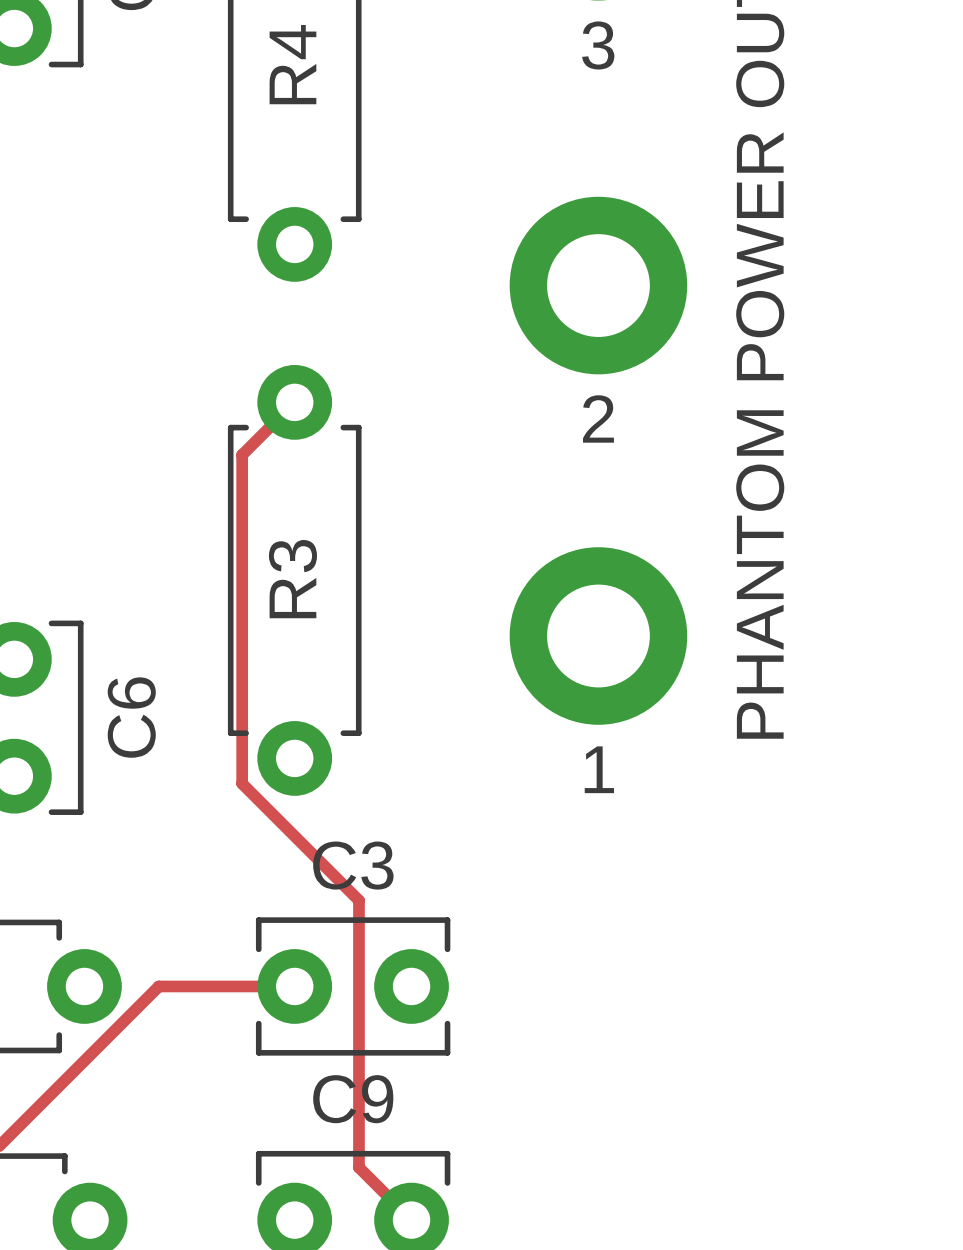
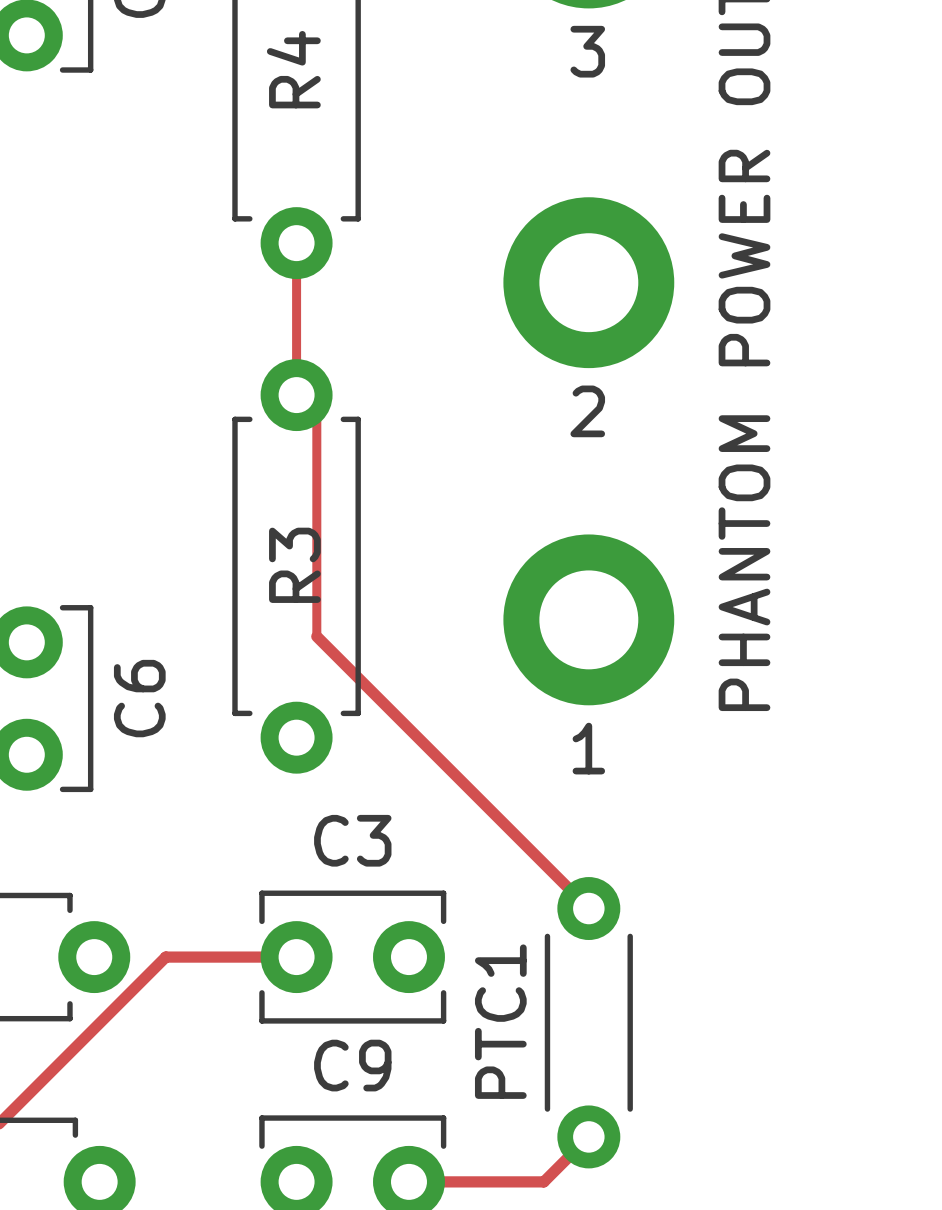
track: none -> (296, 243) (296, 395) (316, 415) (316, 636) (588, 908)
track: (294, 402) (242, 454) (242, 783) (358, 900) (358, 1167) (411, 1220) -> (588, 1136) (543, 1181) (408, 1181)
PTC1: none -> (588, 1022)

